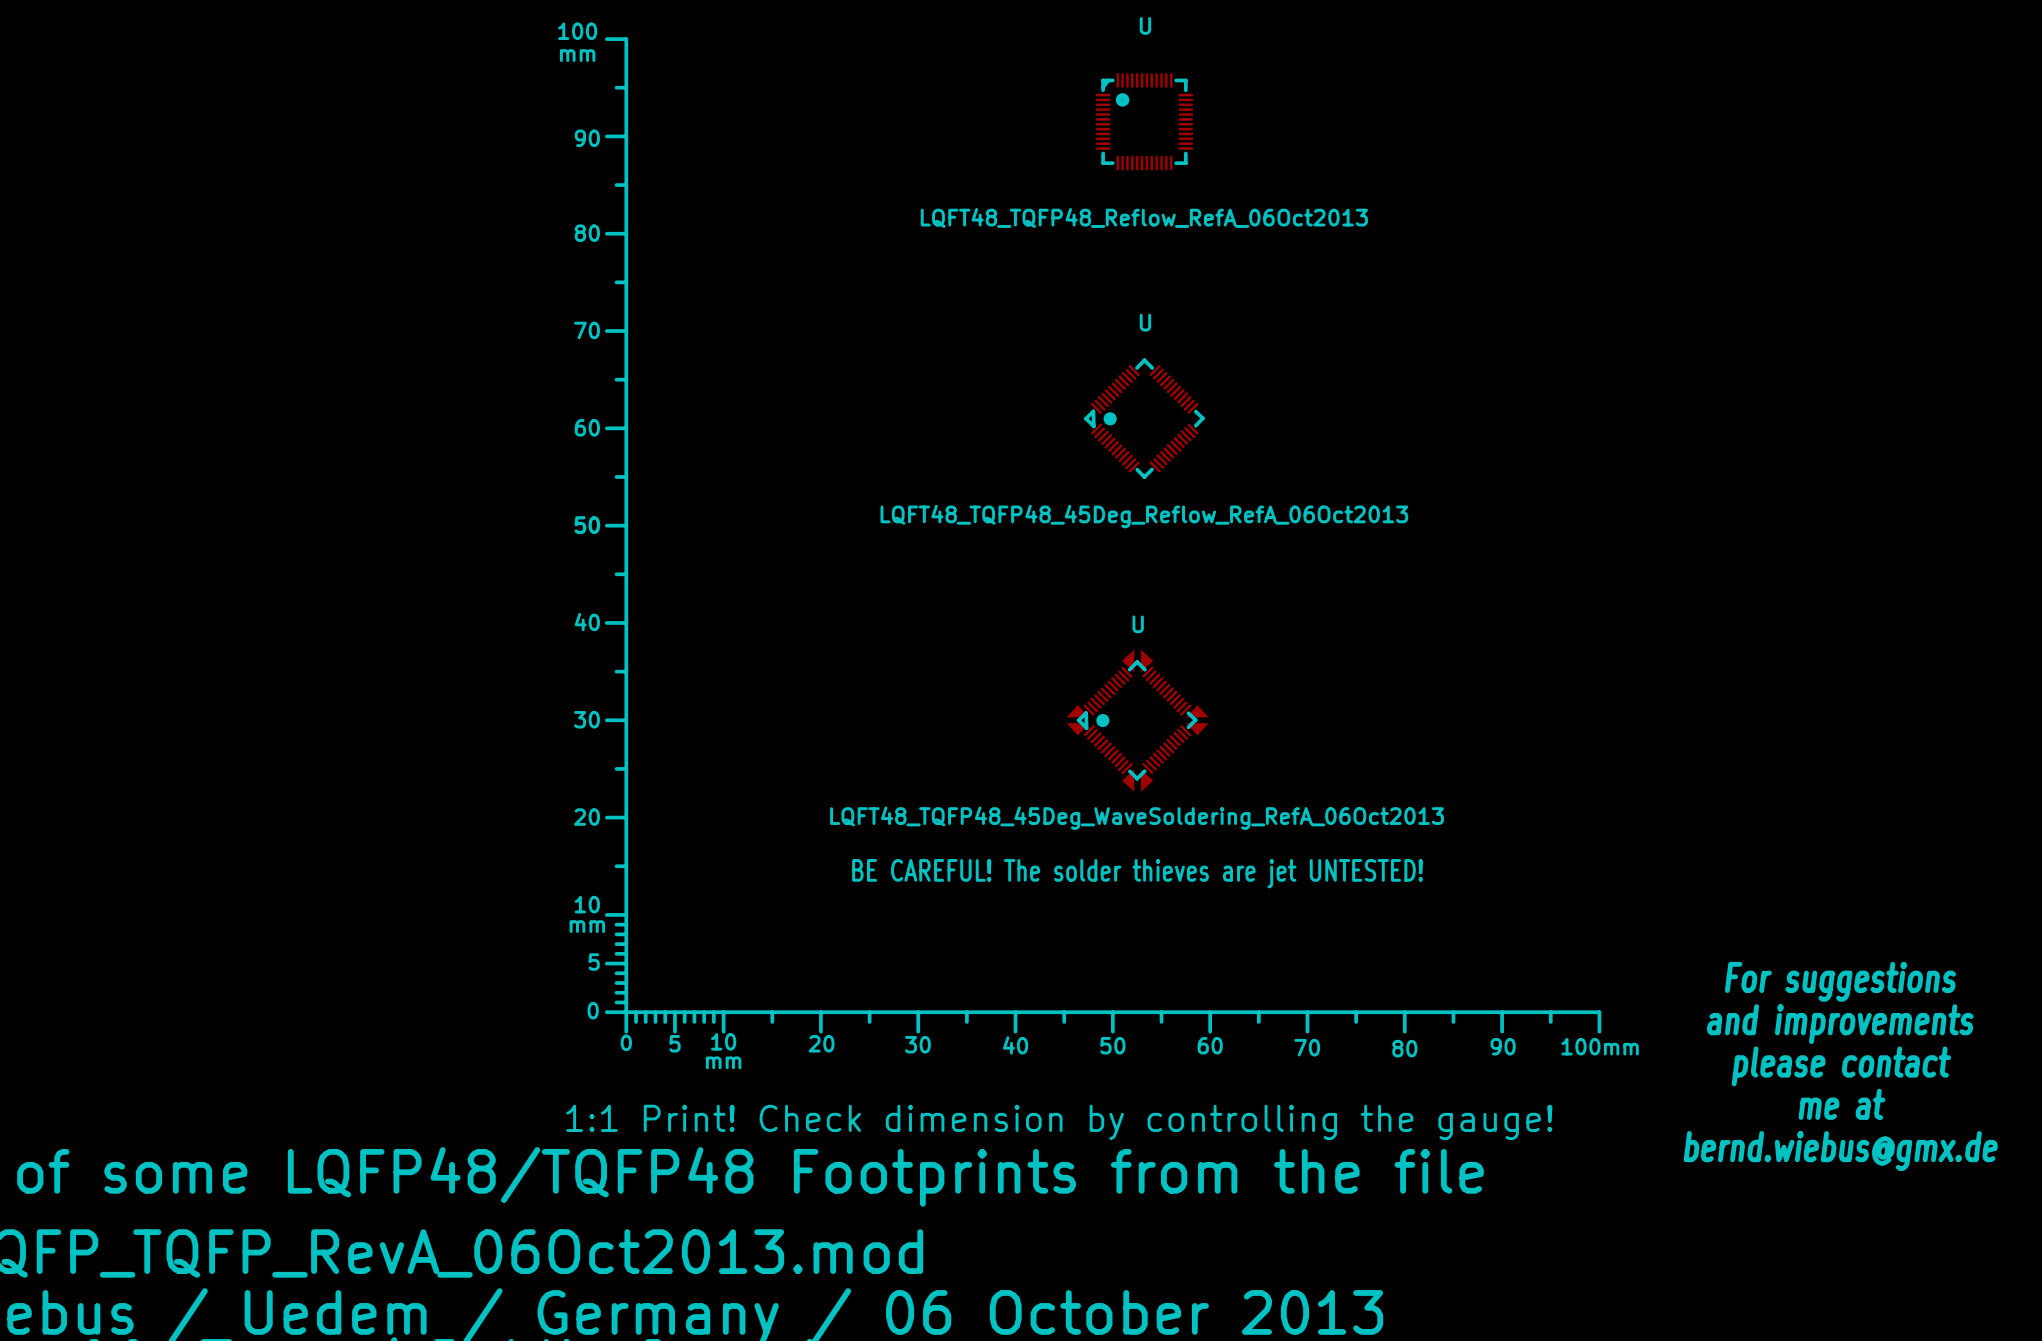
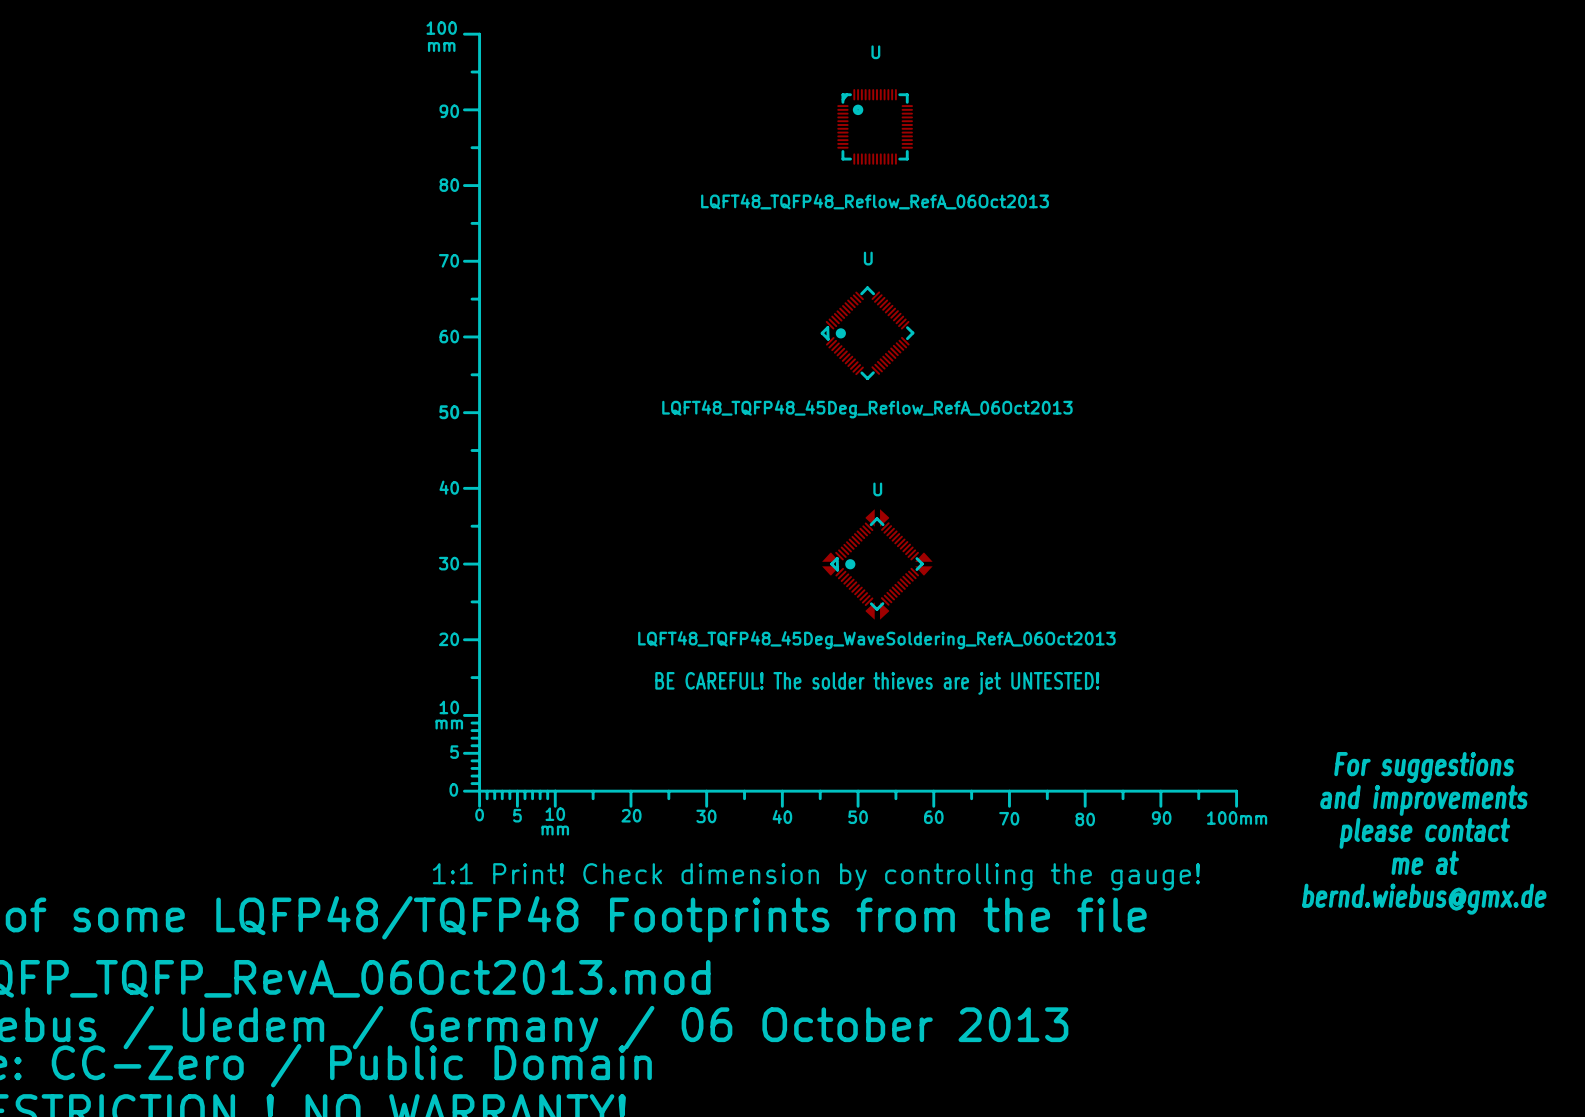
U position: (1144, 121) -> (875, 126)
U position: (1144, 418) -> (867, 333)

